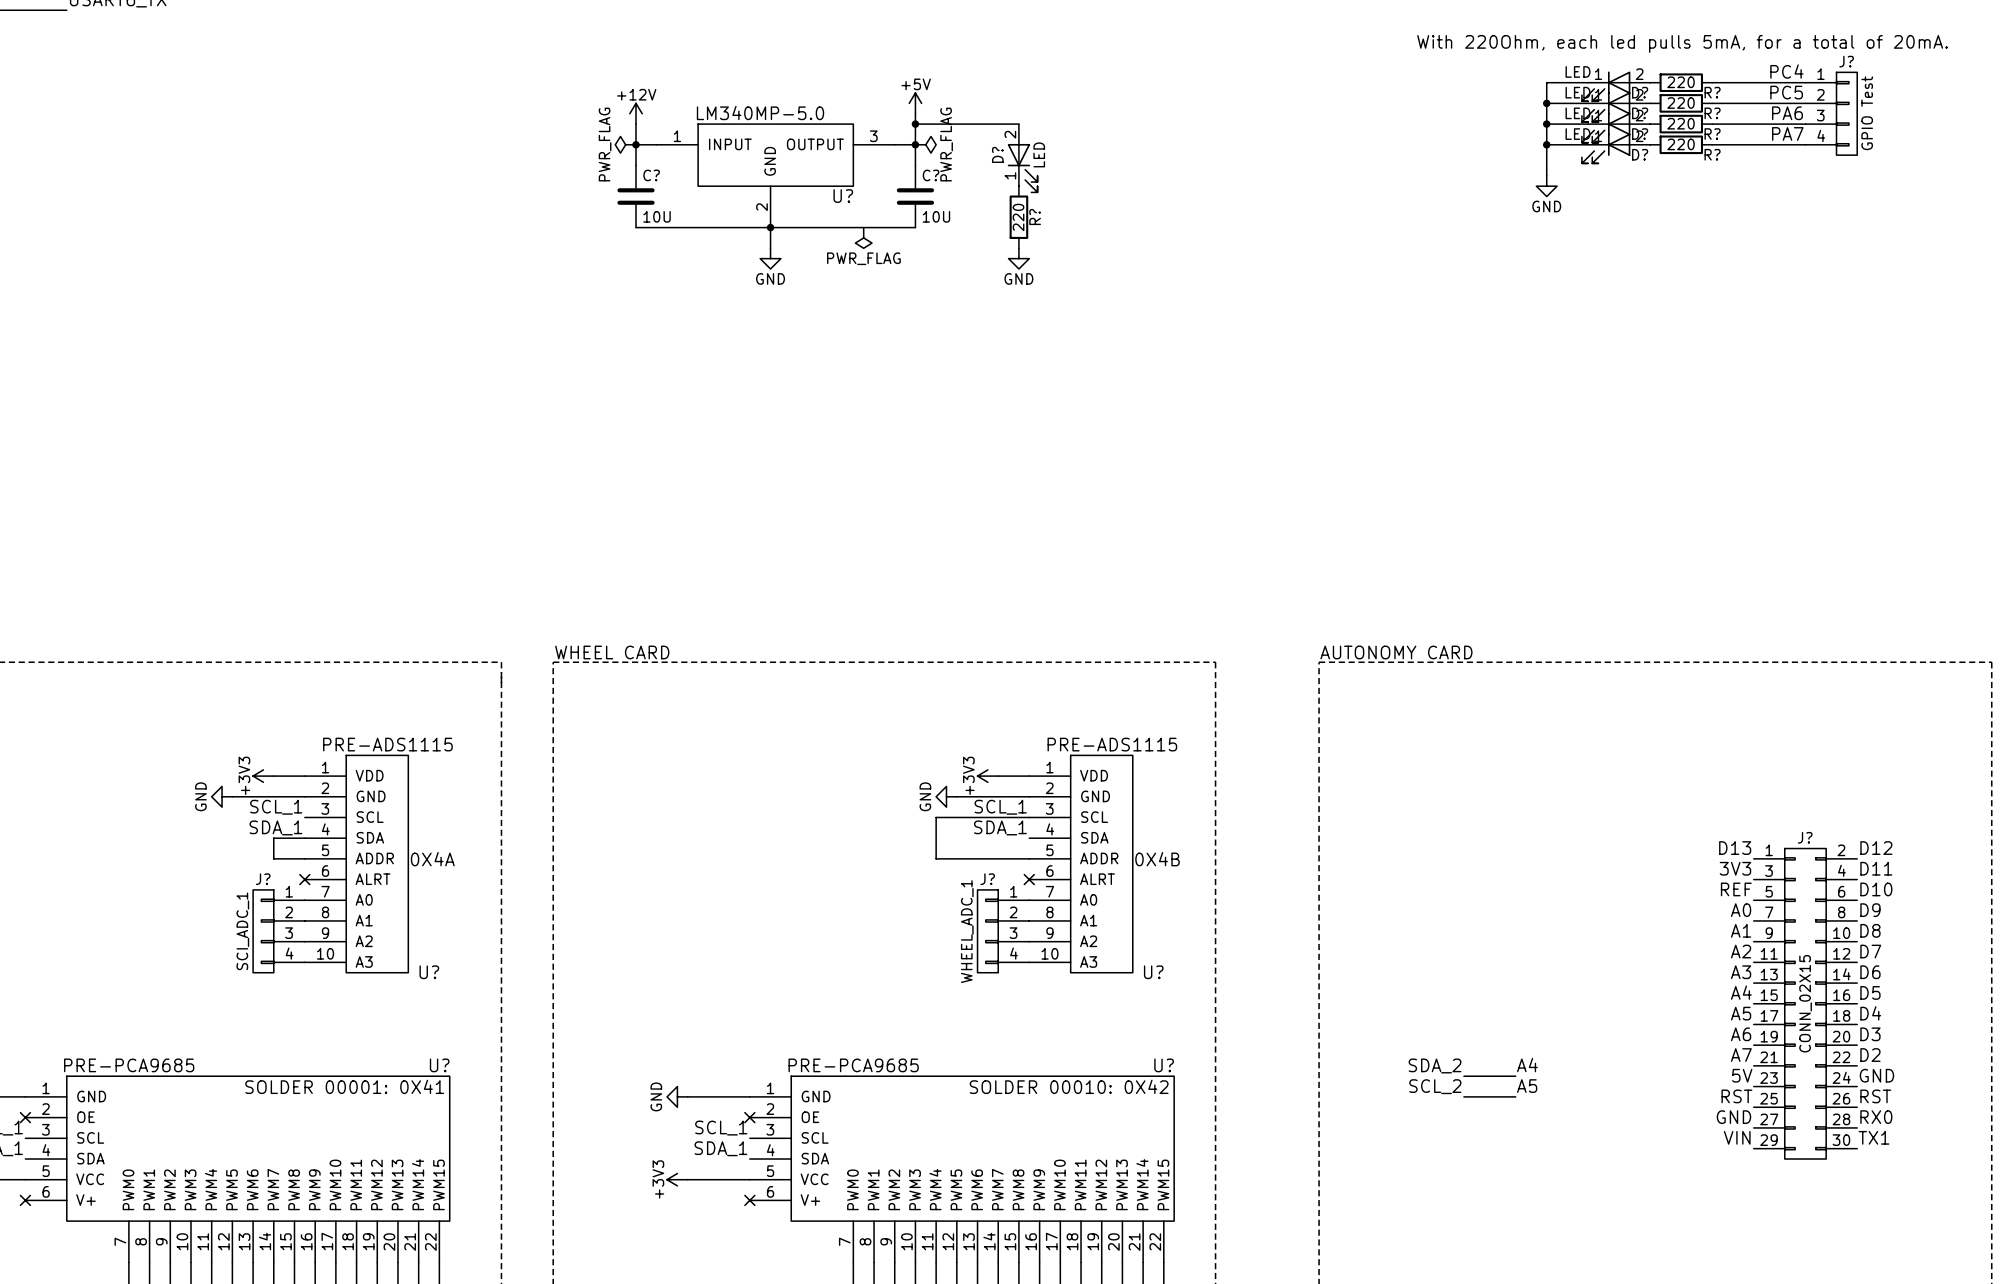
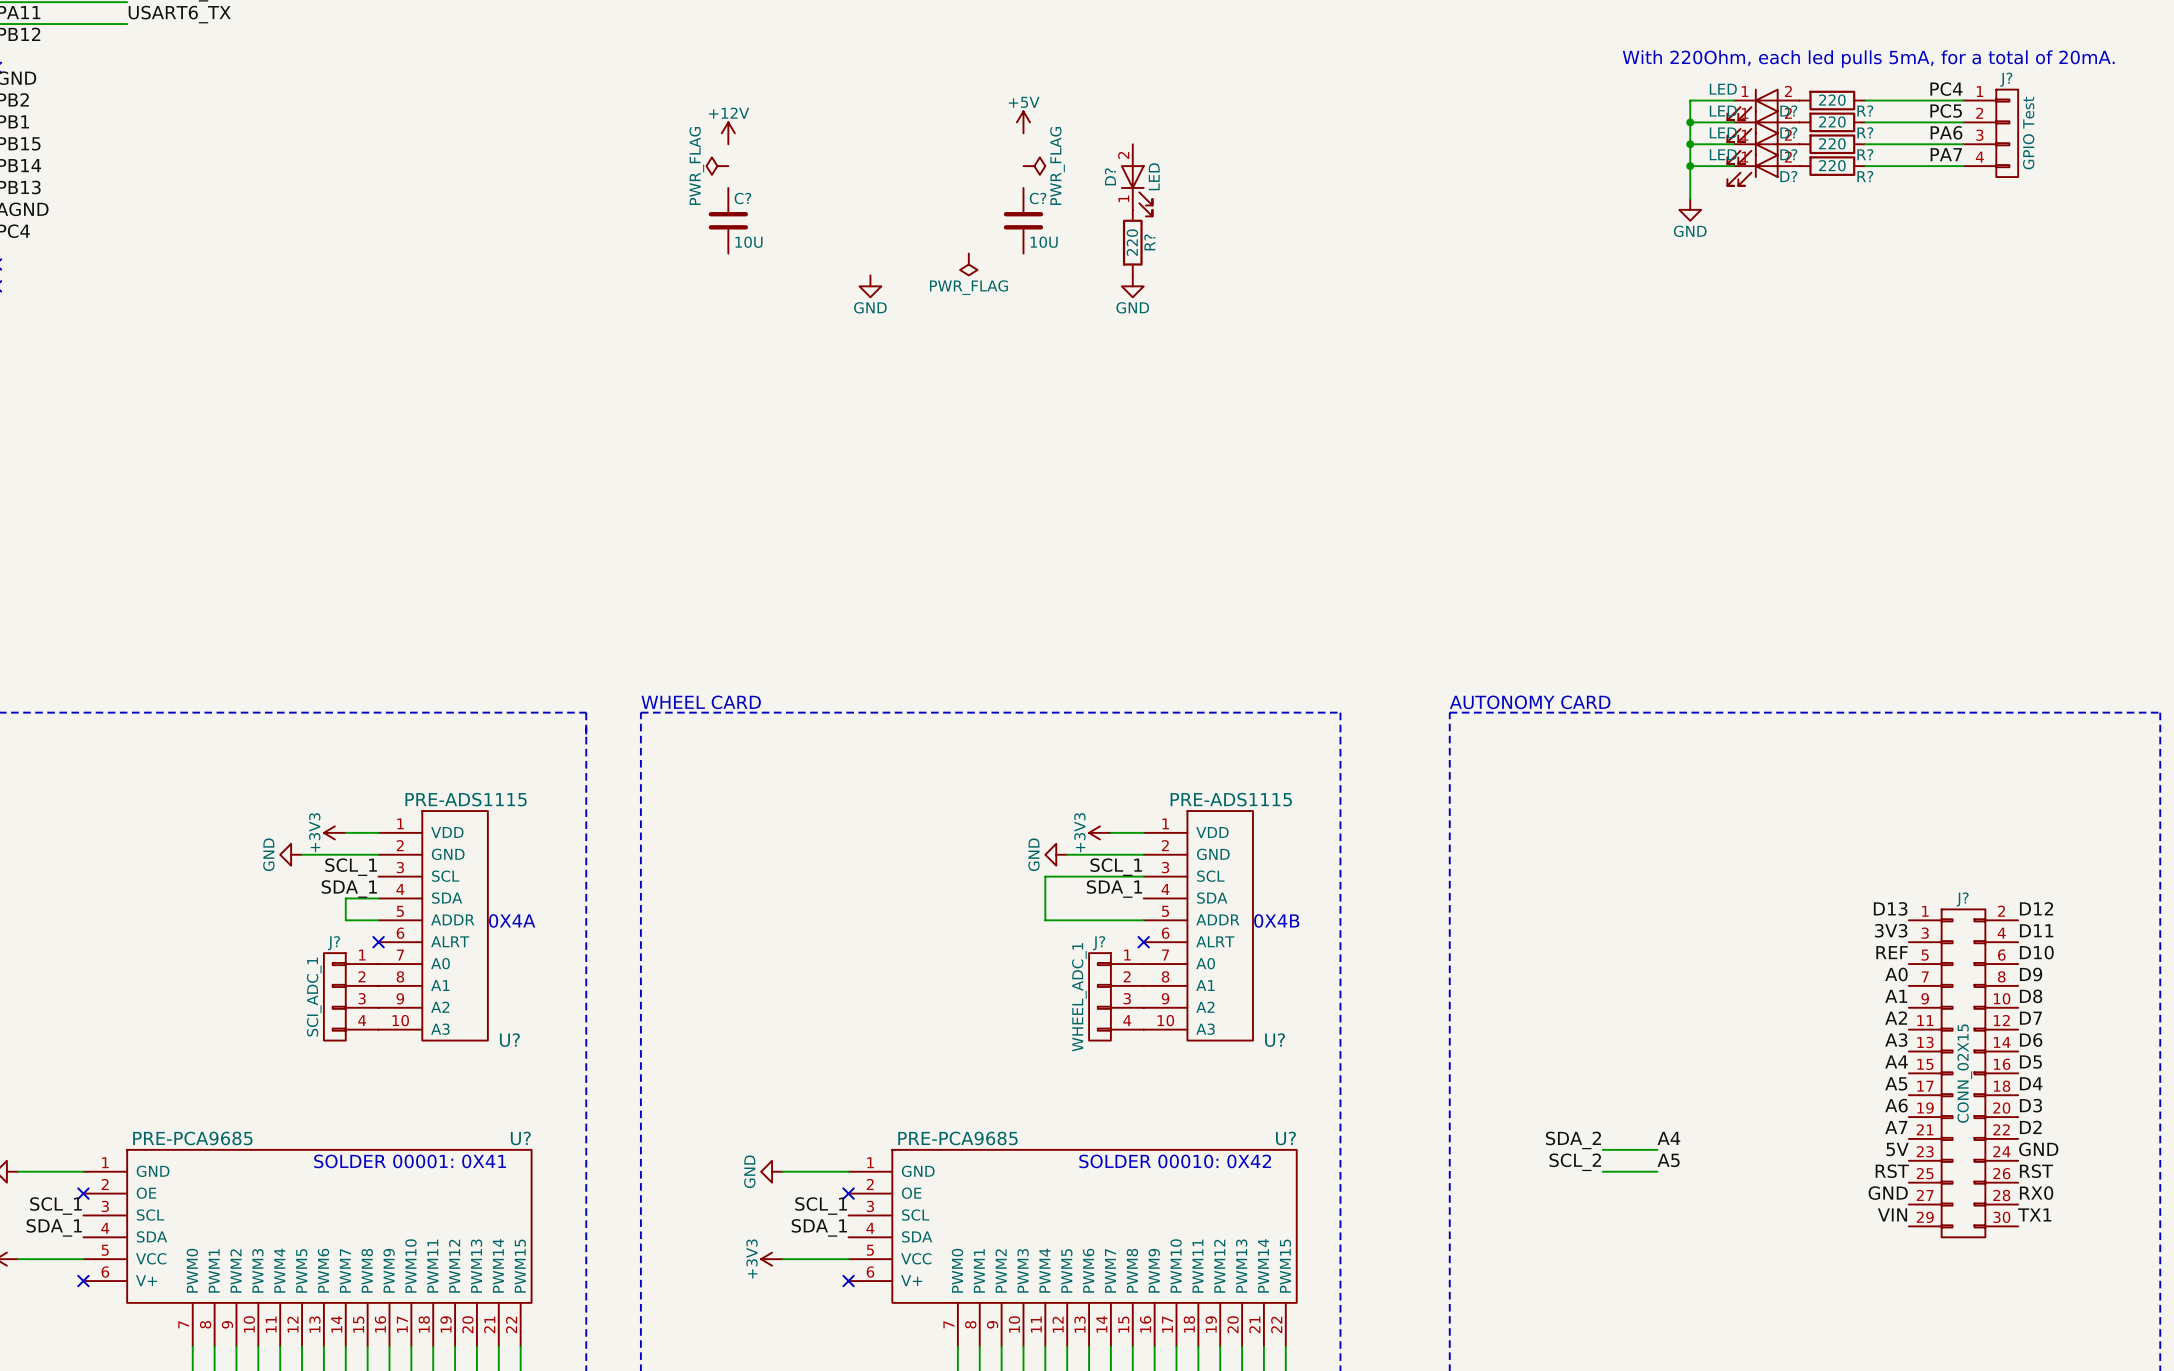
wire: (915, 113) (915, 165) -> none
wire: (636, 124) (636, 165) -> none
wire: (915, 124) (1018, 124) -> none
junction: (915, 124) -> none
wire: (636, 144) (656, 144) -> none
junction: (636, 144) -> none
wire: (894, 144) (915, 144) -> none
junction: (915, 144) -> none
U?: LM340MP-5.0 (775, 175) -> none
wire: (636, 227) (915, 227) -> none
wire: (770, 227) (770, 248) -> none
junction: (770, 227) -> none

